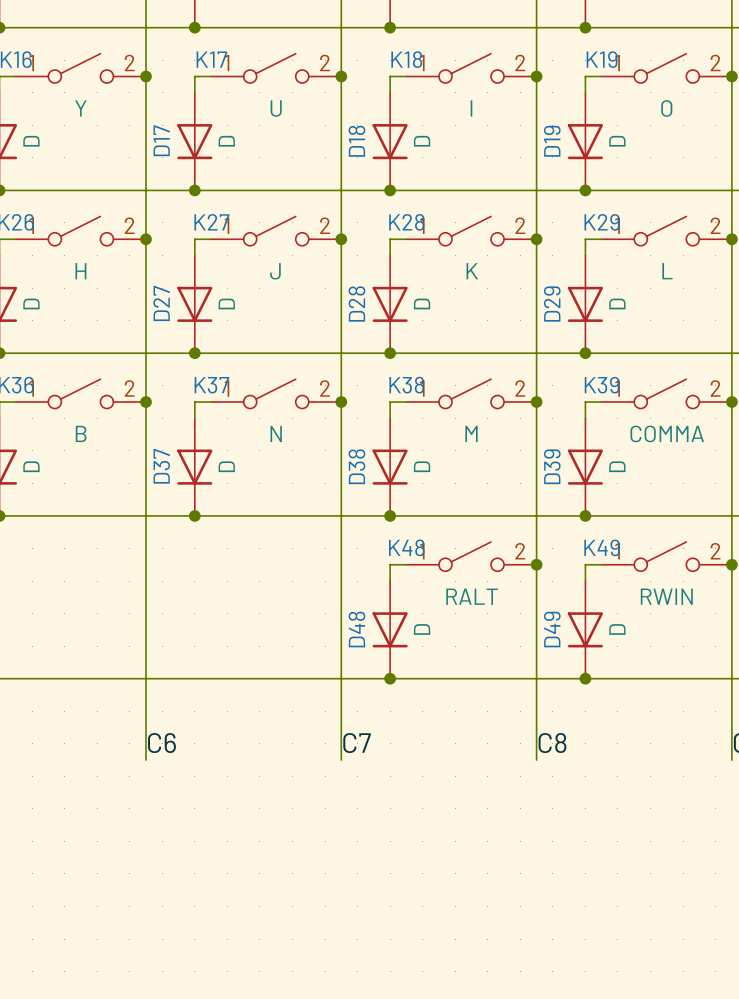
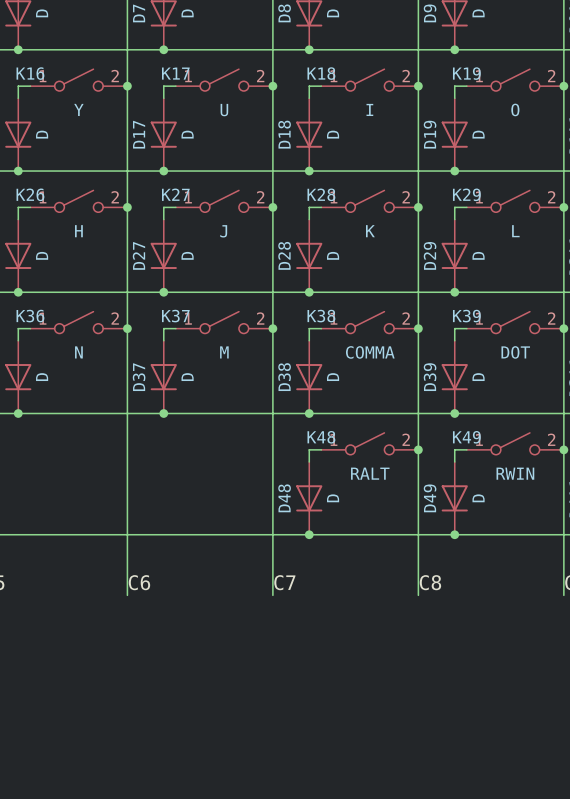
K36 value: B (81, 433) -> N (78, 352)
K37 value: N (276, 433) -> M (224, 352)
K38 value: M (471, 433) -> COMMA (370, 352)
K39 value: COMMA (667, 433) -> DOT (515, 352)

